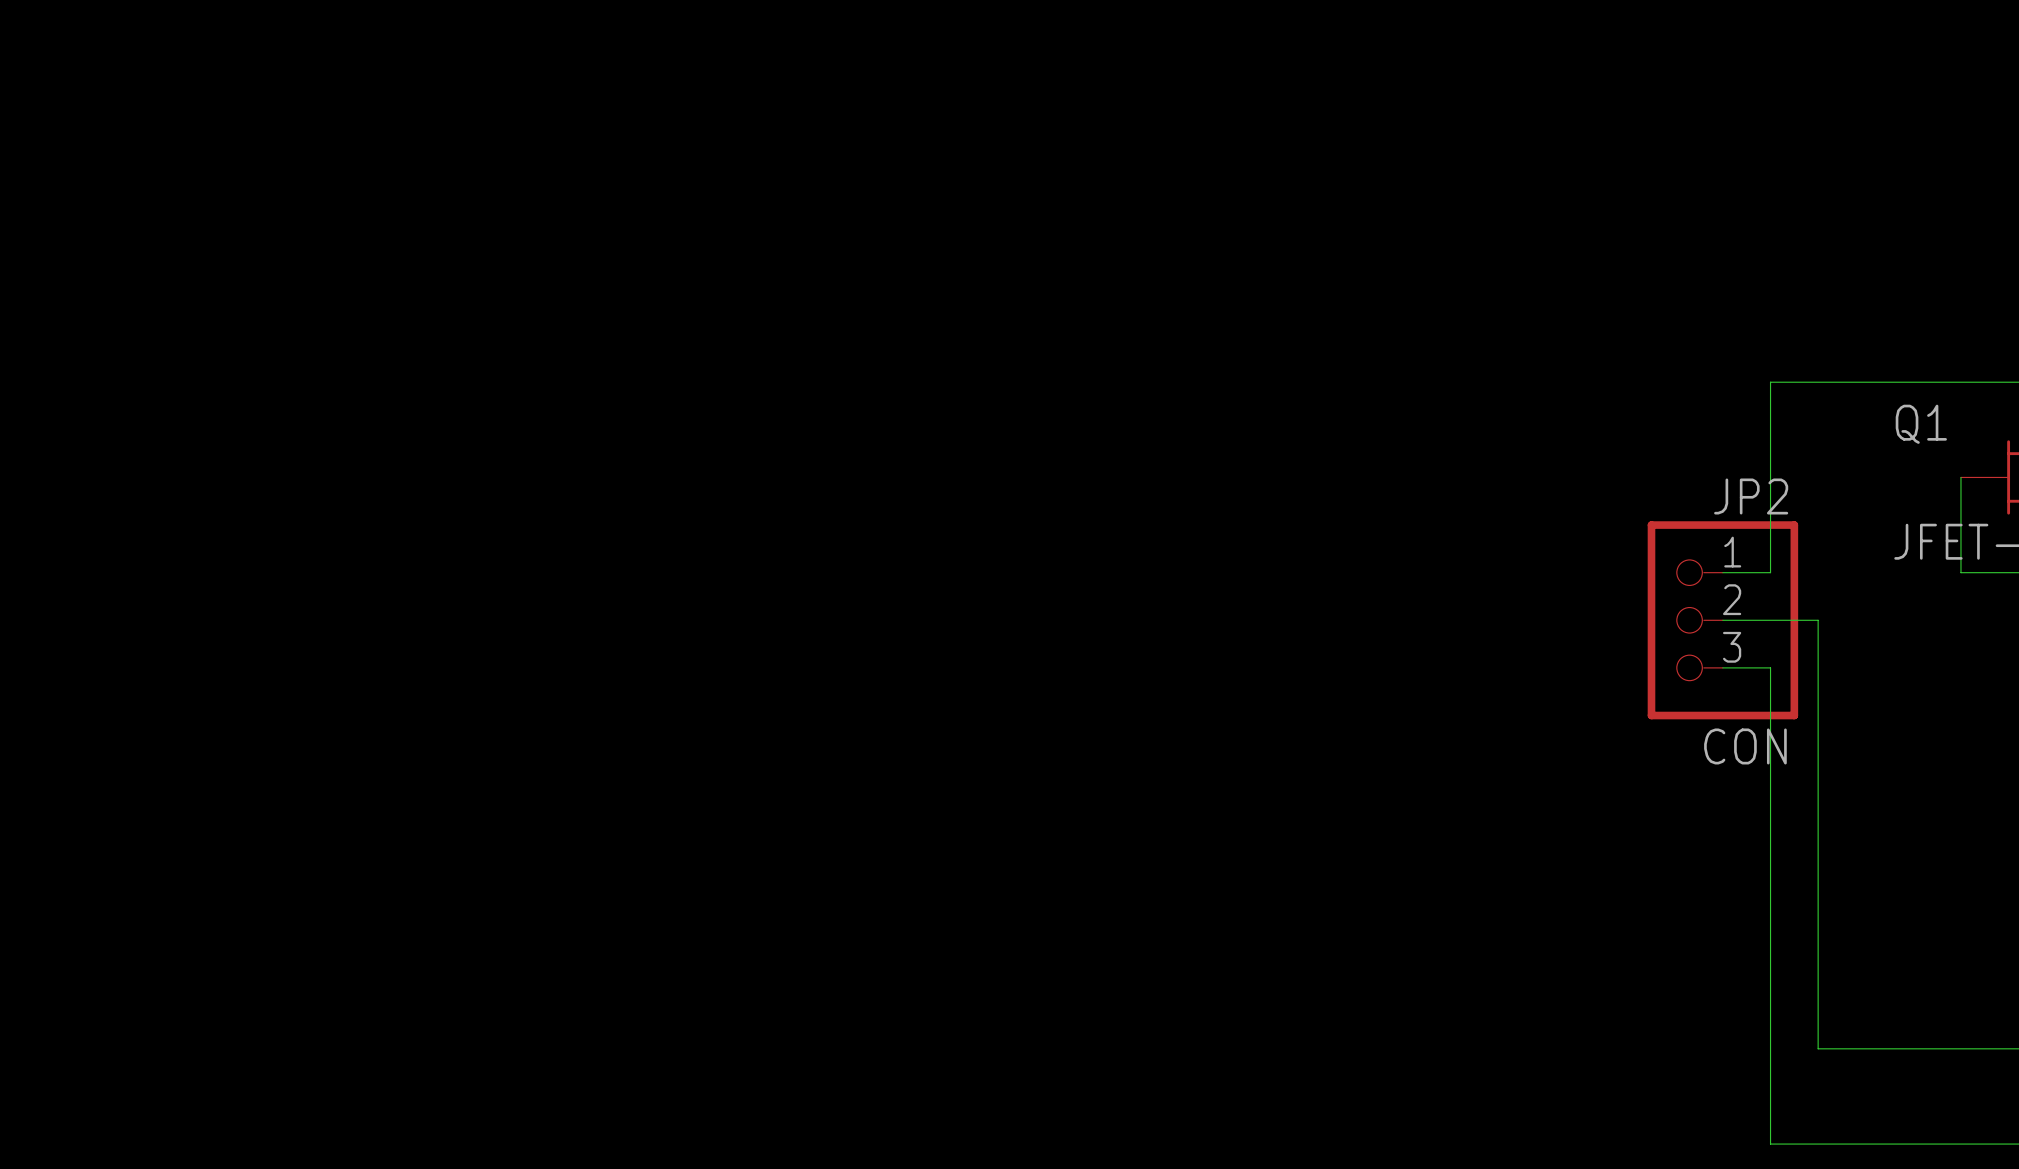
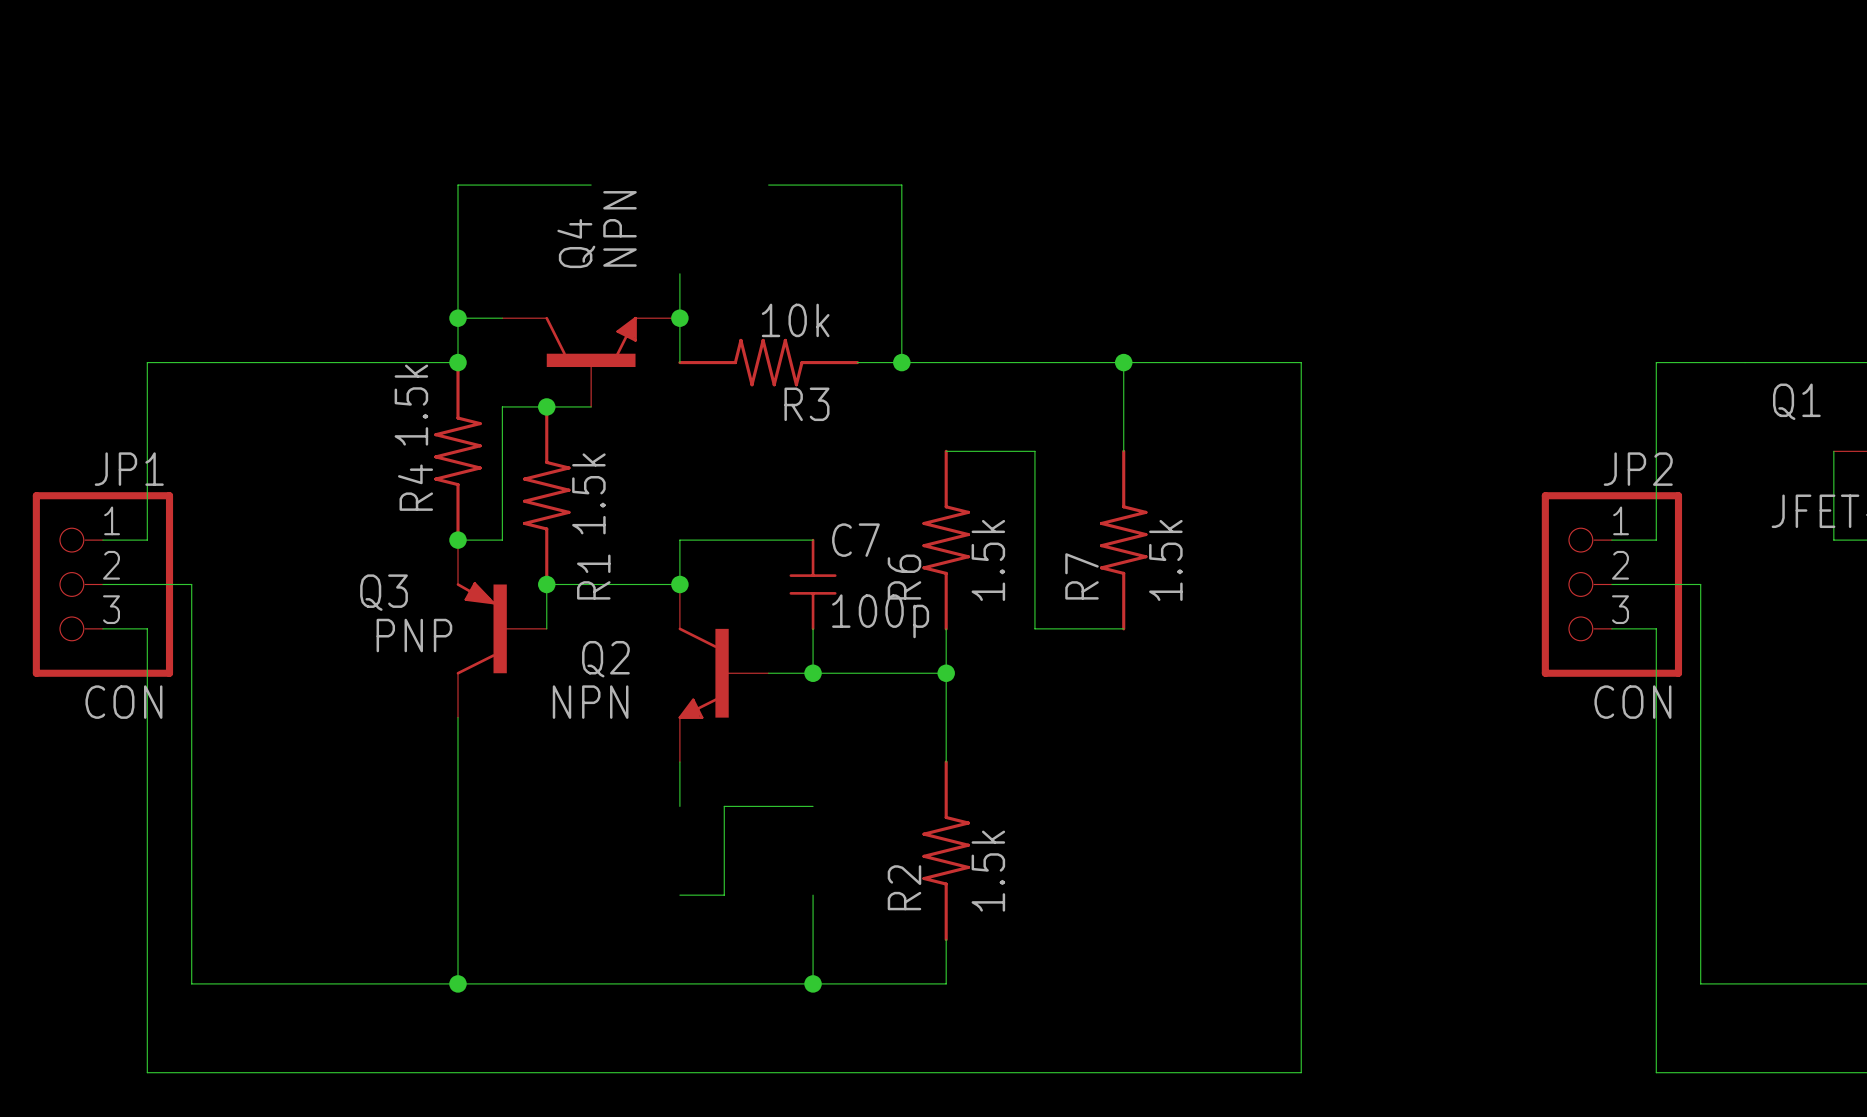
wire: none -> (591, 185) (457, 185) (457, 362) (147, 362) (147, 540) (102, 540)
wire: none -> (768, 185) (901, 185) (901, 362)
wire: none -> (679, 273) (679, 362)
wire: none -> (457, 318) (502, 318)
junction: none -> (457, 318)
junction: none -> (679, 318)
Q4: none -> NPN (591, 361)
junction: none -> (457, 362)
R3: none -> 10k (768, 362)
wire: none -> (857, 362) (1301, 362) (1301, 1072) (147, 1072) (147, 628) (102, 628)
junction: none -> (901, 362)
wire: none -> (1123, 362) (1123, 451)
junction: none -> (1123, 362)
junction: none -> (546, 406)
wire: none -> (591, 406) (502, 406) (502, 540) (457, 540)
R4: none -> 1.5k (457, 451)
wire: none -> (946, 451) (1034, 451) (1034, 628) (1123, 628)
R1: none -> 1.5k (546, 495)
junction: none -> (457, 540)
wire: none -> (813, 540) (679, 540) (679, 584) (546, 584) (546, 628)
R6: none -> 1.5k (946, 540)
R7: none -> 1.5k (1123, 540)
wire: none -> (102, 584) (191, 584) (191, 983) (946, 983) (946, 939)
JP1: none -> CON (102, 584)
junction: none -> (546, 584)
junction: none -> (679, 584)
C7: none -> 100p (813, 584)
Q3: none -> PNP (501, 628)
wire: none -> (813, 628) (813, 673)
wire: none -> (946, 628) (946, 762)
Q2: none -> NPN (723, 673)
wire: none -> (768, 673) (946, 673)
junction: none -> (813, 673)
junction: none -> (946, 673)
wire: none -> (457, 717) (457, 983)
wire: none -> (679, 762) (679, 806)
wire: none -> (813, 806) (724, 806) (724, 895) (679, 895)
R2: none -> 1.5k (946, 850)
wire: none -> (813, 895) (813, 983)
junction: none -> (457, 983)
junction: none -> (813, 983)

